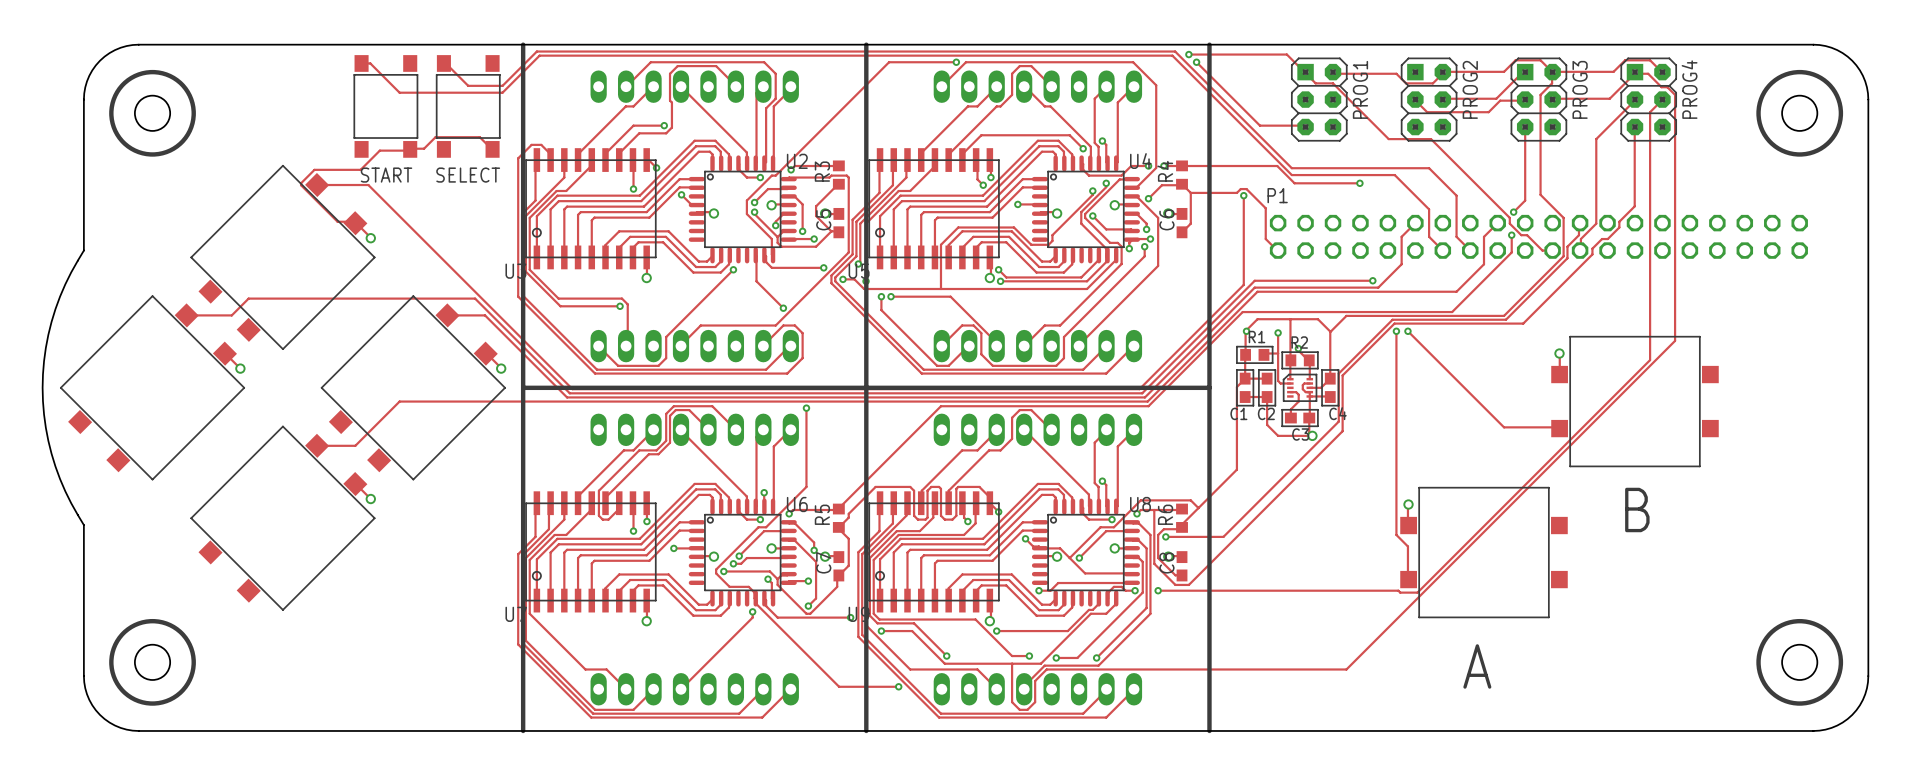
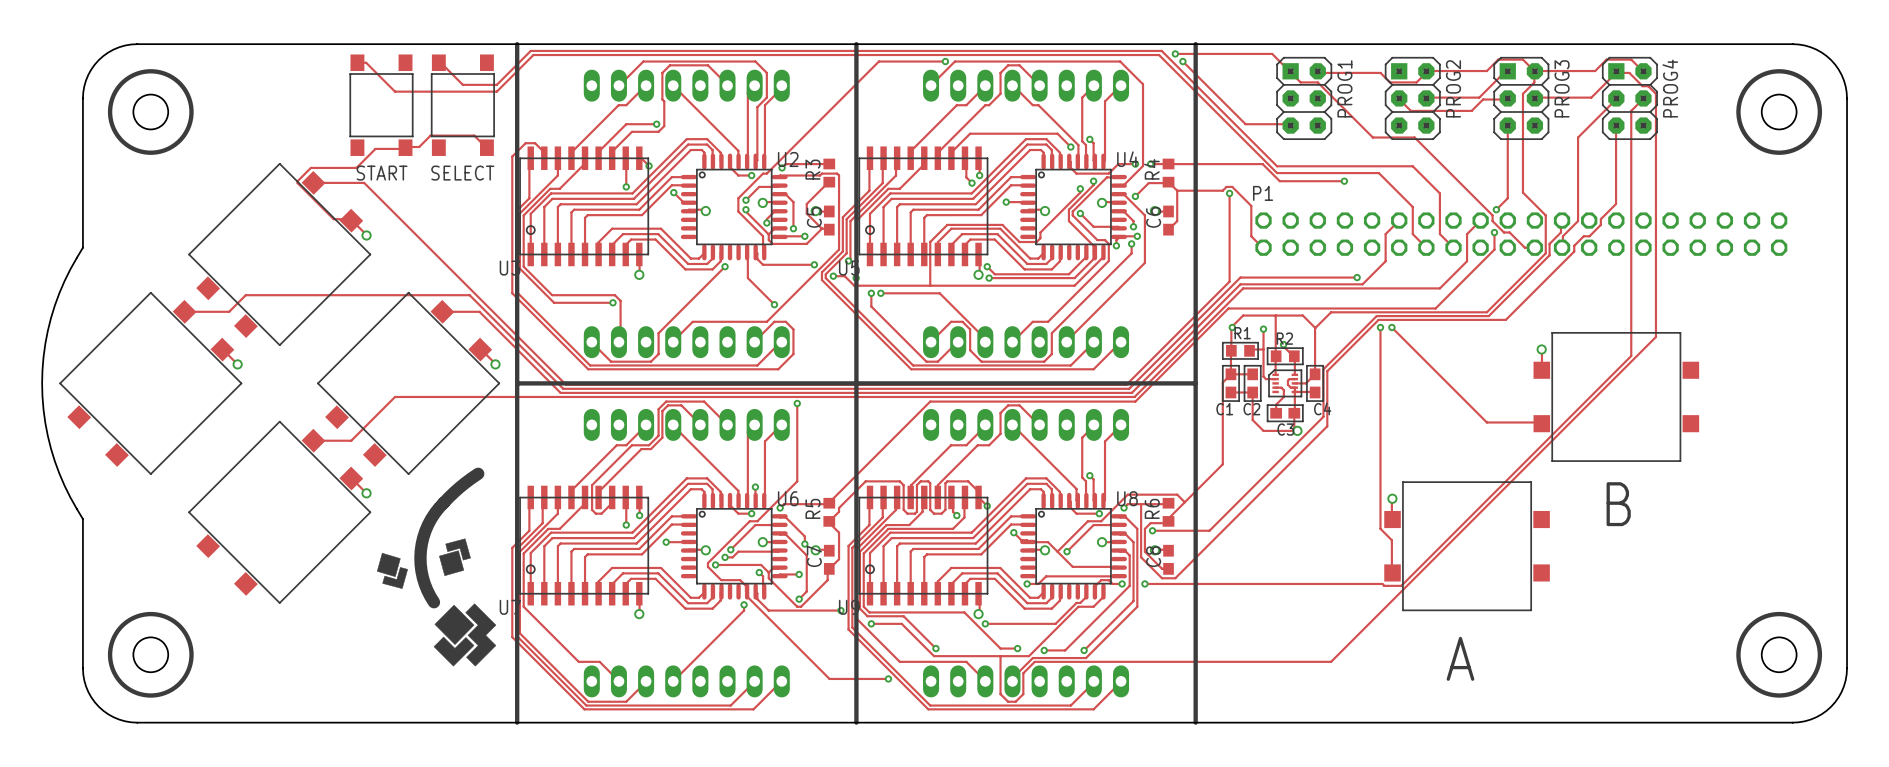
line: none -> (478, 473) (443, 503)
line: none -> (443, 502) (428, 524) (420, 550) (422, 577) (433, 602)
drawing: none -> [439, 538, 471, 576]
drawing: none -> [377, 552, 408, 589]
drawing: none -> [433, 603, 497, 667]

